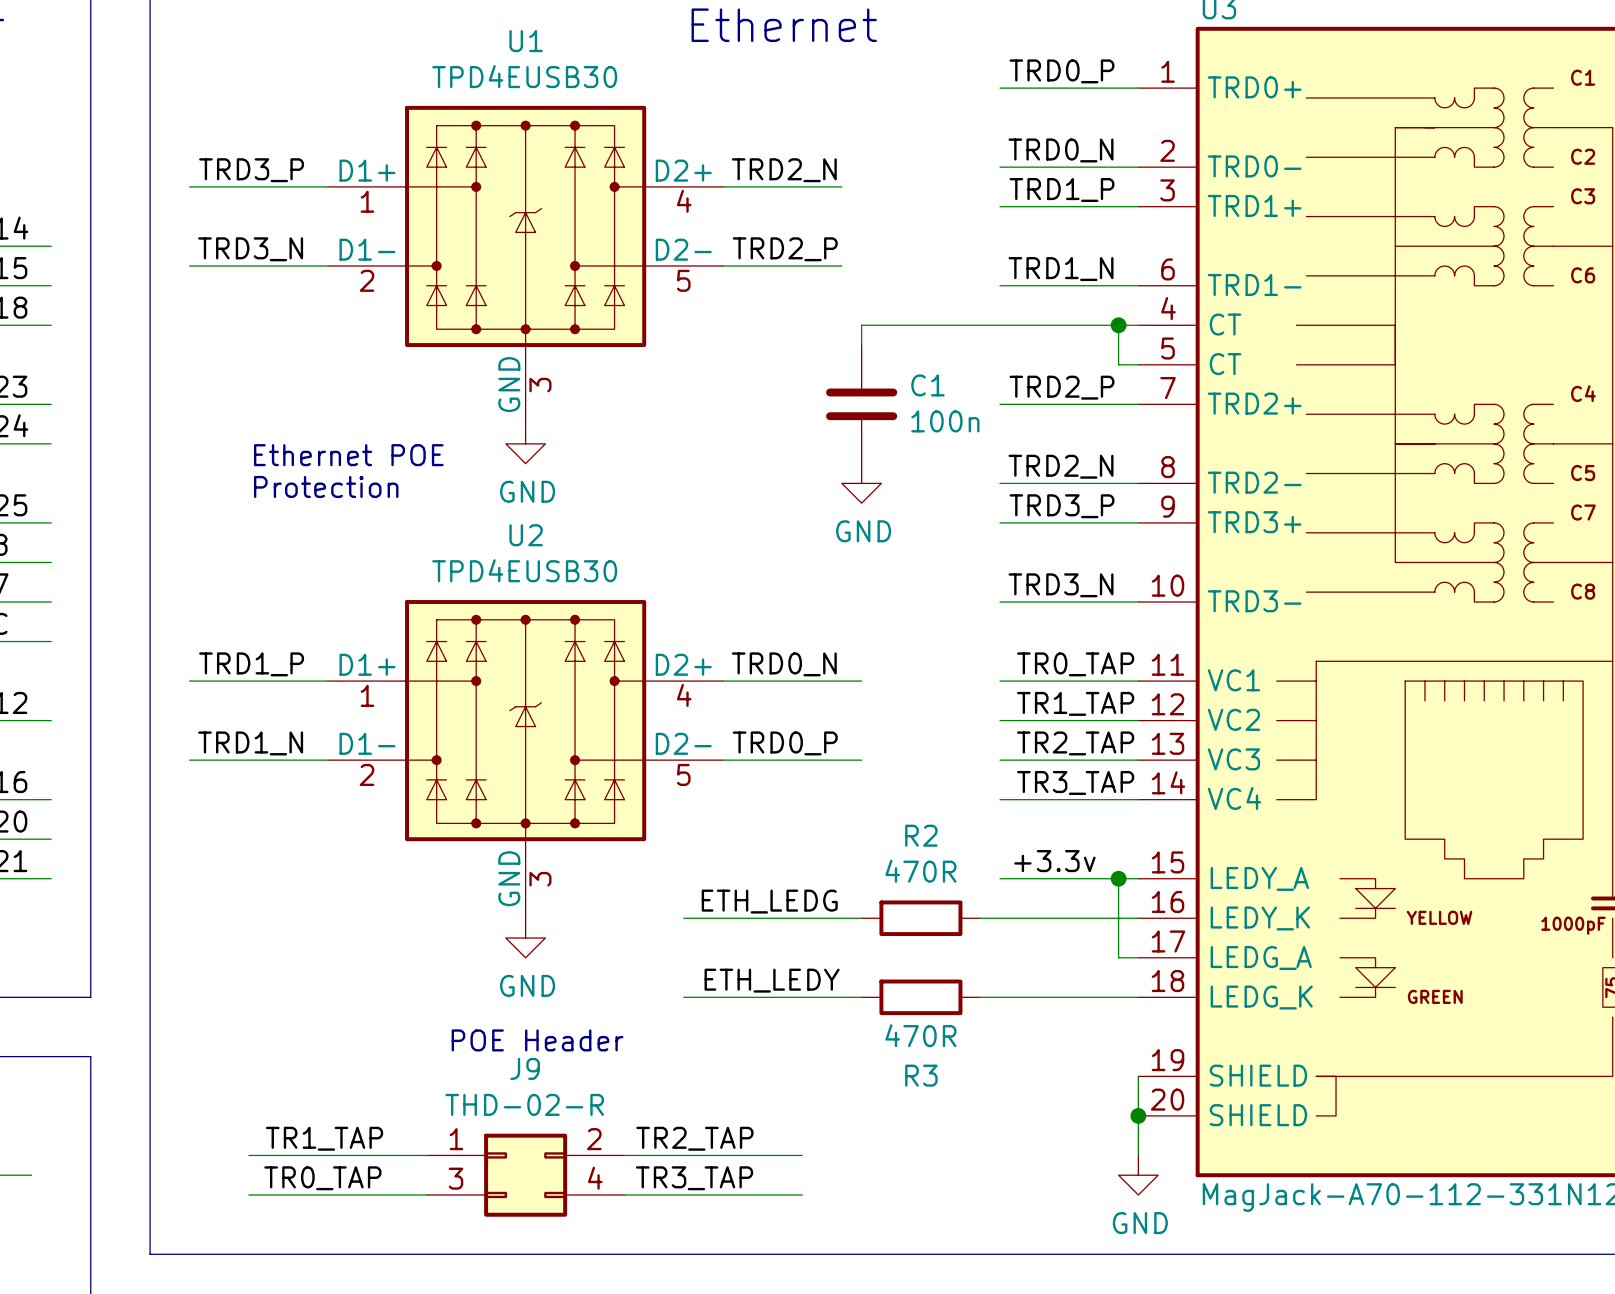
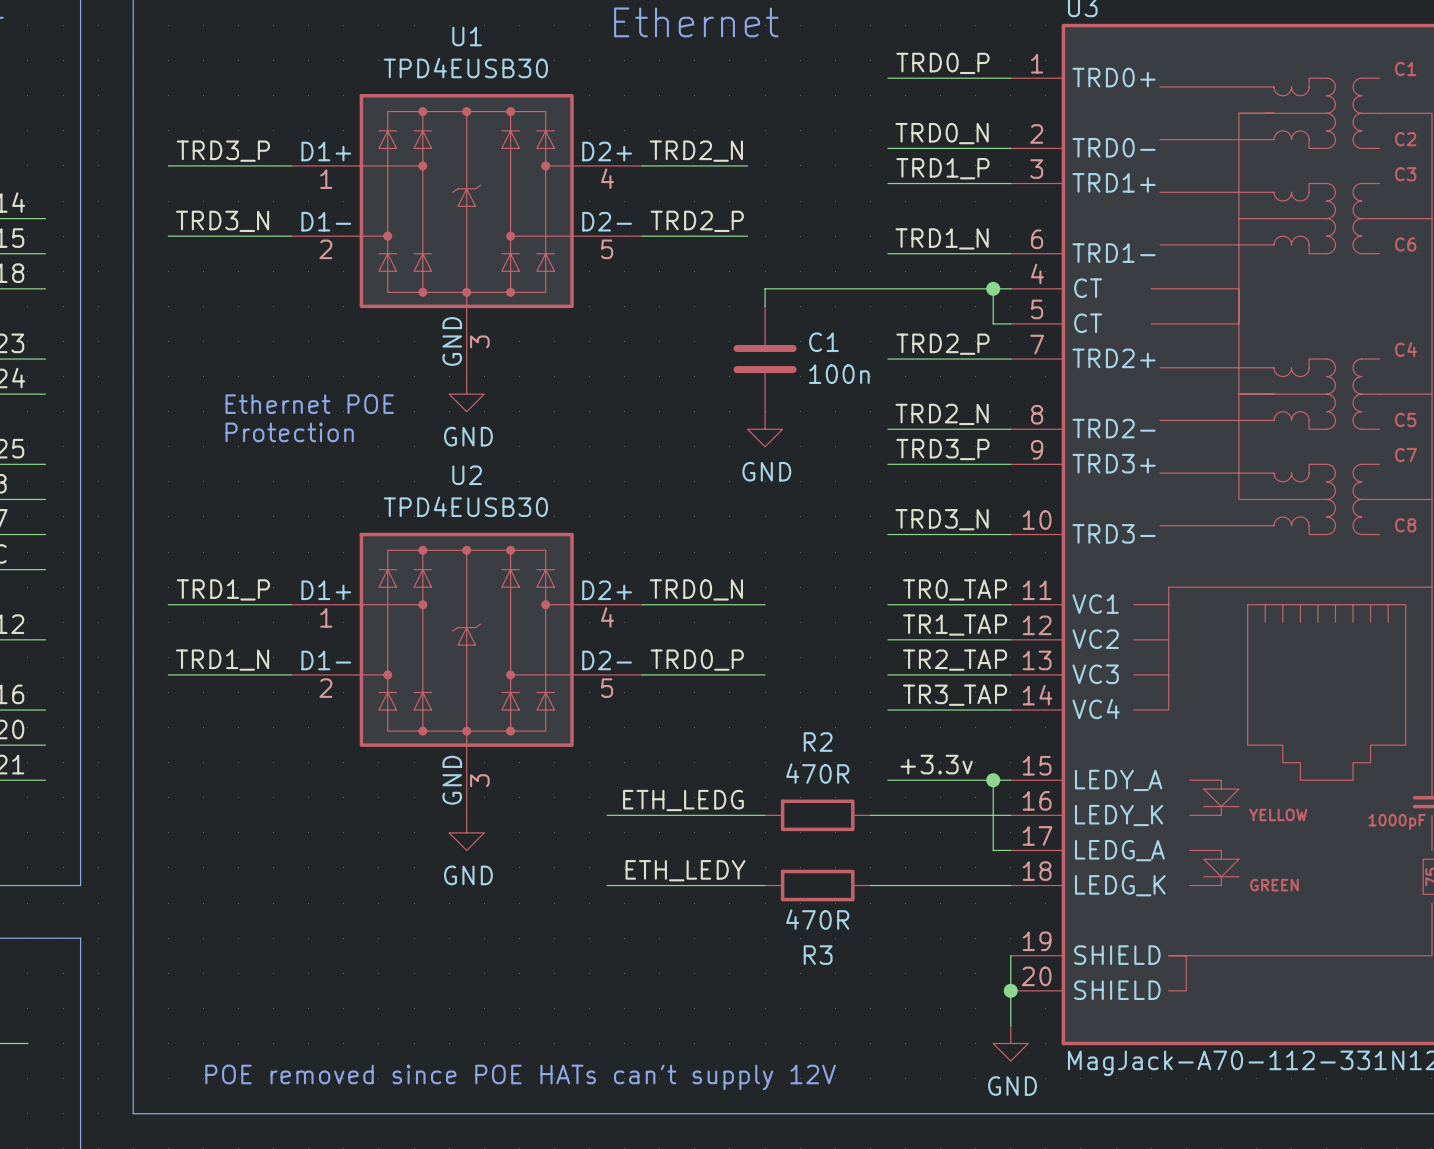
text: POE Header (537, 1040) -> none
label: TR1_TAP (324, 1138) -> none
label: TR2_TAP (694, 1138) -> none
wire: (248, 1155) (426, 1155) -> none
wire: (624, 1155) (802, 1155) -> none
J9: THD-02-R (525, 1175) -> none
label: TR0_TAP (322, 1178) -> none
label: TR3_TAP (694, 1178) -> none
wire: (248, 1194) (426, 1194) -> none
wire: (624, 1194) (802, 1194) -> none
text: none -> POE removed since POE HATs can't supply 12V (520, 1077)

